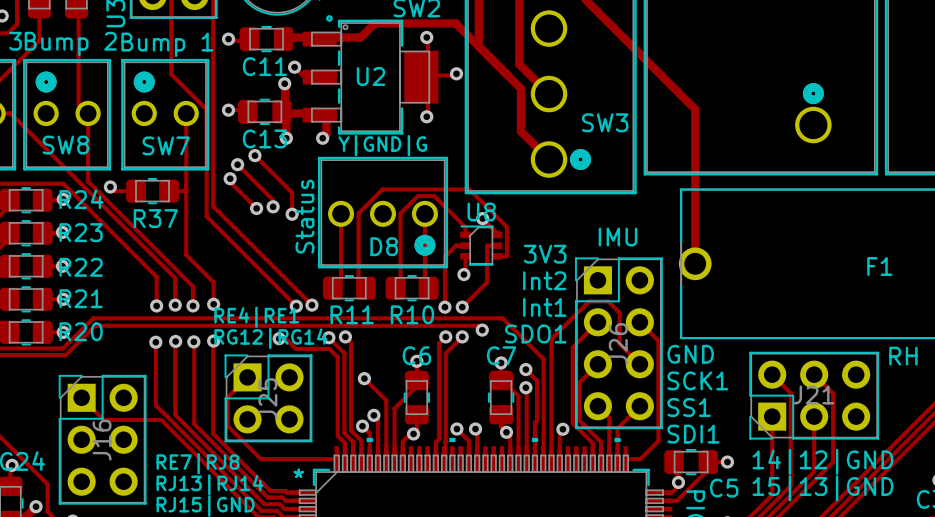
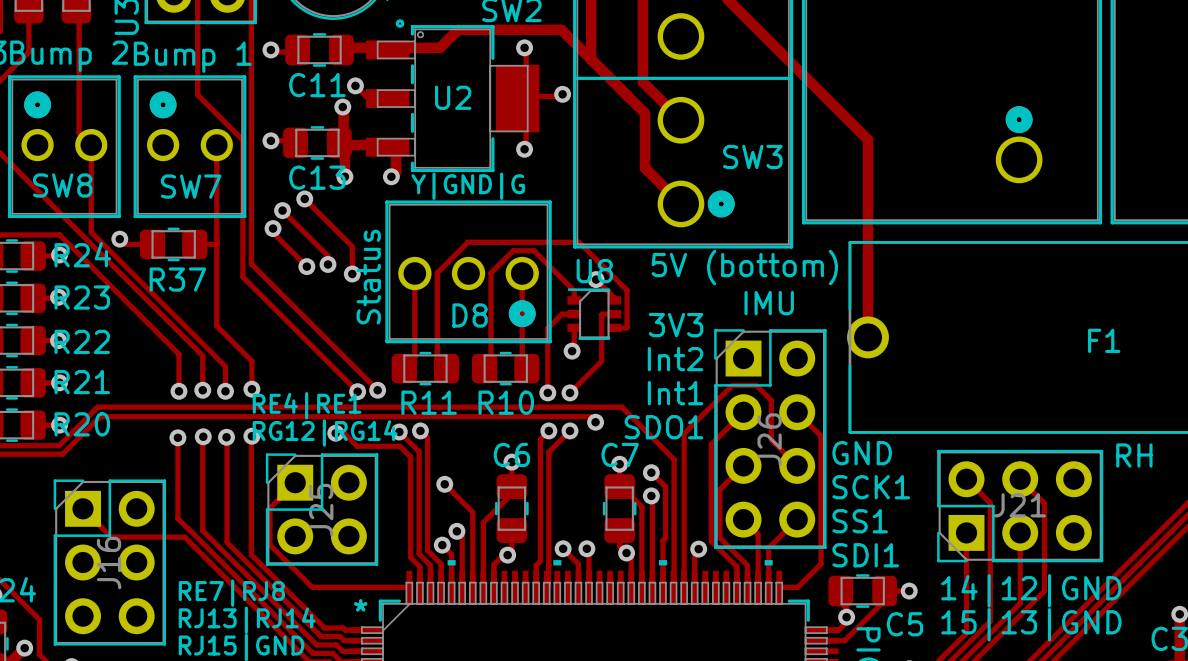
line: none -> (574, 78) (791, 78)
text: none -> 5V (bottom) (744, 267)

